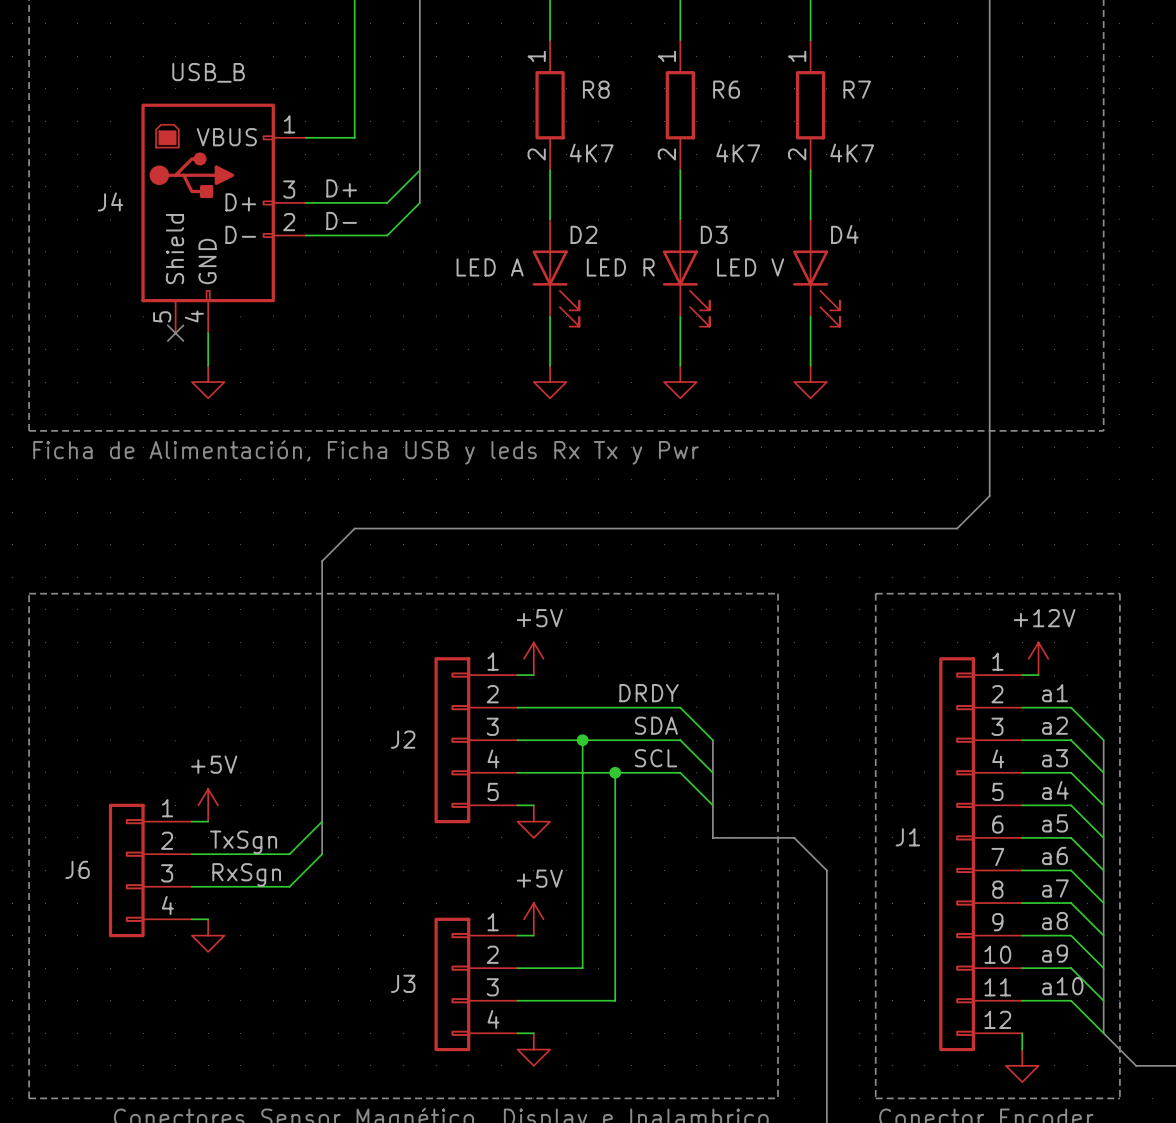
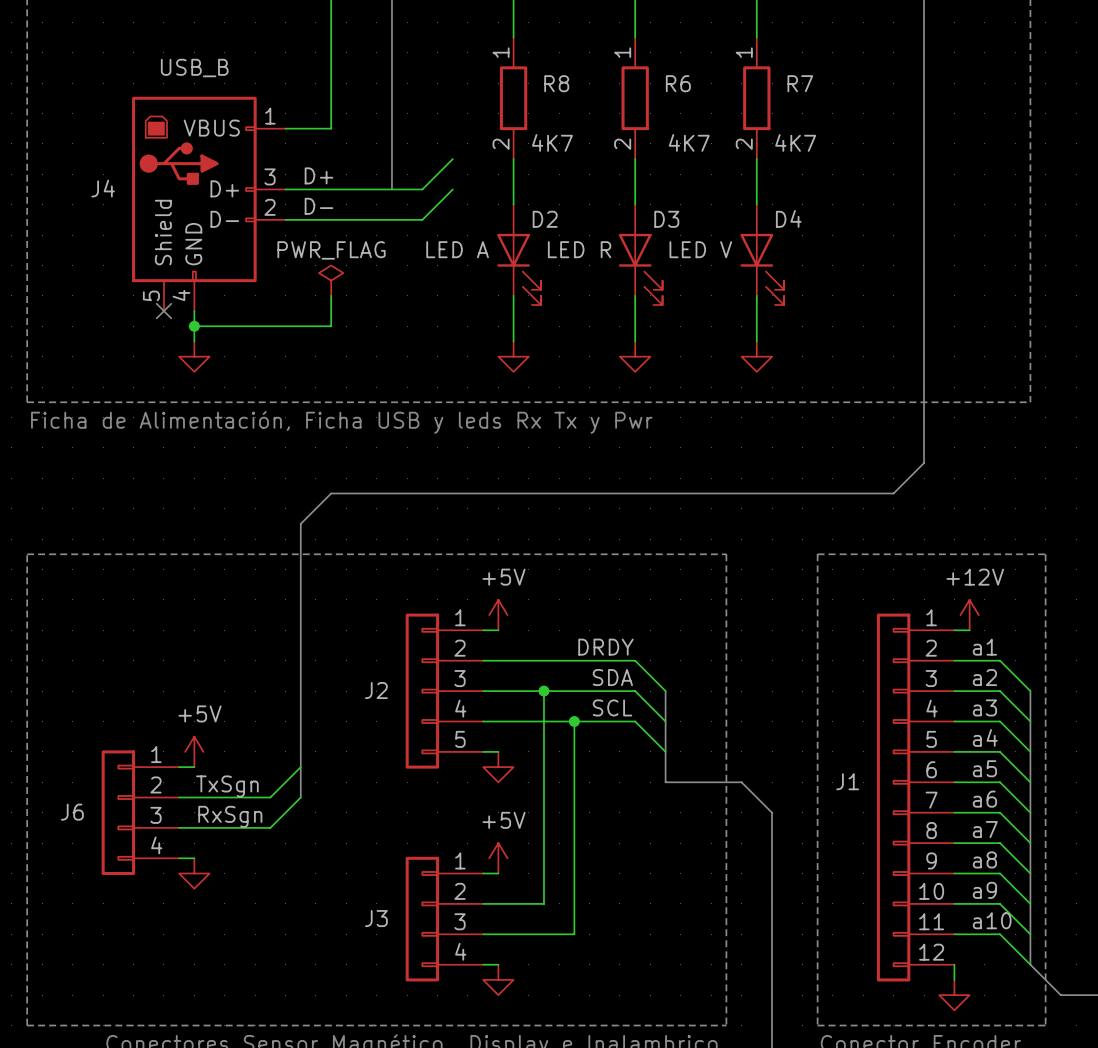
wire: (419, 170) (387, 202) -> (452, 159) (422, 189) (361, 189)
wire: (419, 202) (387, 235) -> (452, 189) (422, 219) (361, 219)
power symbol: none -> PWR_FLAG (331, 280)
wire: none -> (331, 295) (331, 326) (194, 326)
junction: none -> (194, 326)

